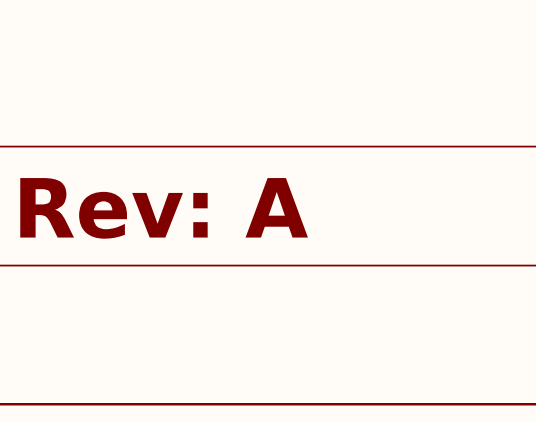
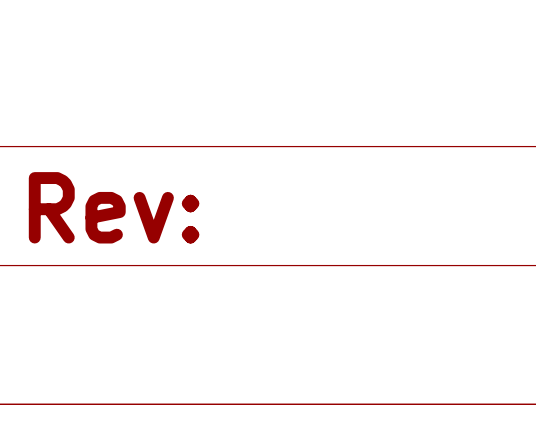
title block: Rev: A (164, 208) -> Rev: (114, 207)

